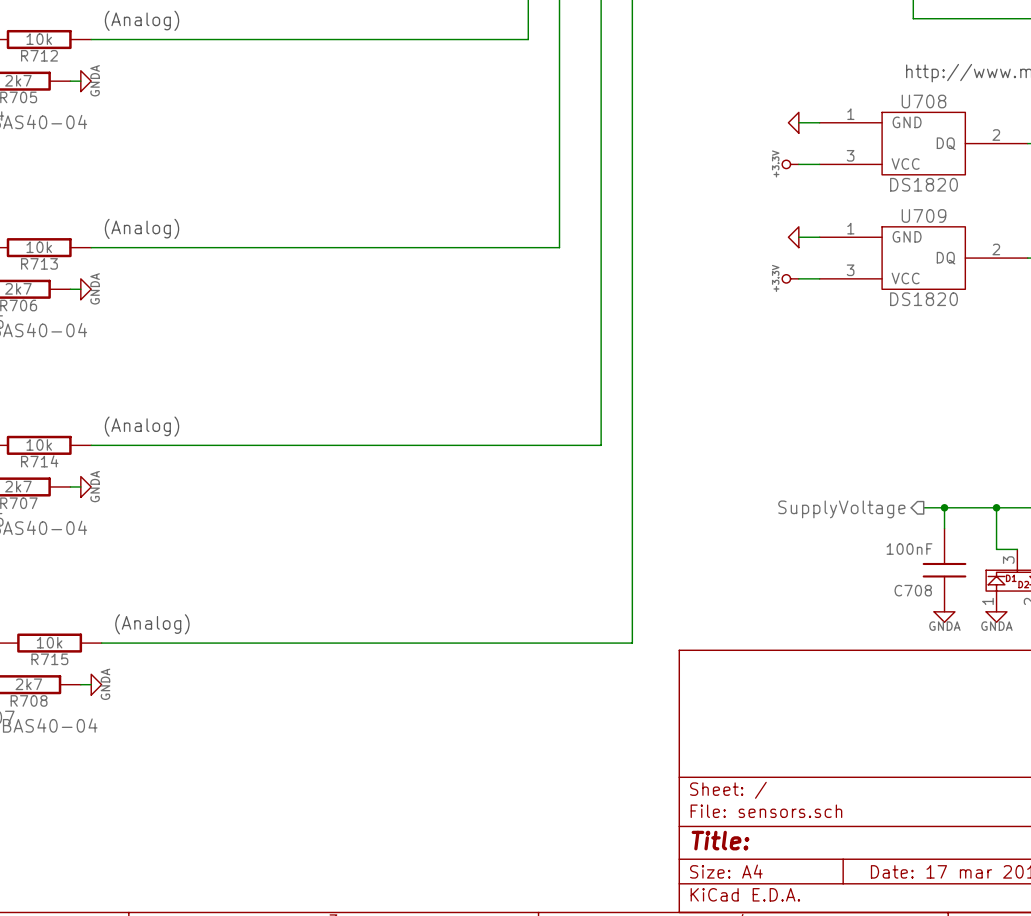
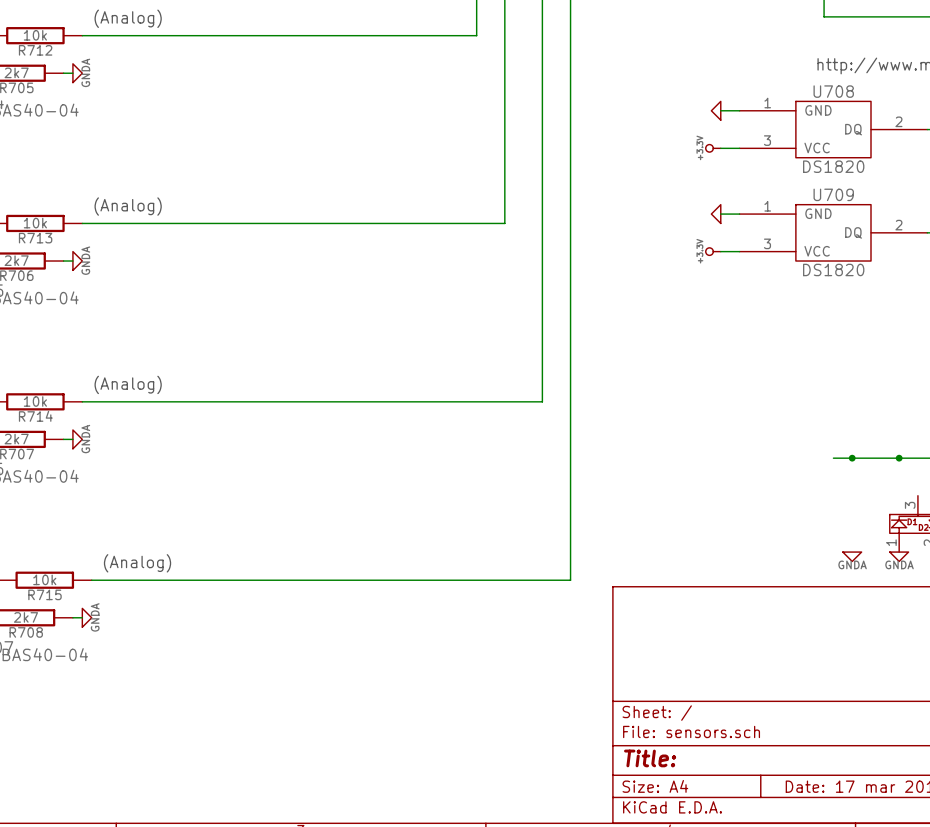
wire: (944, 507) (944, 528) -> none
wire: (996, 507) (996, 549) (1017, 549) -> none
hierarchical label: SupplyVoltage (841, 509) -> none
C708: 100nF (944, 570) -> none

